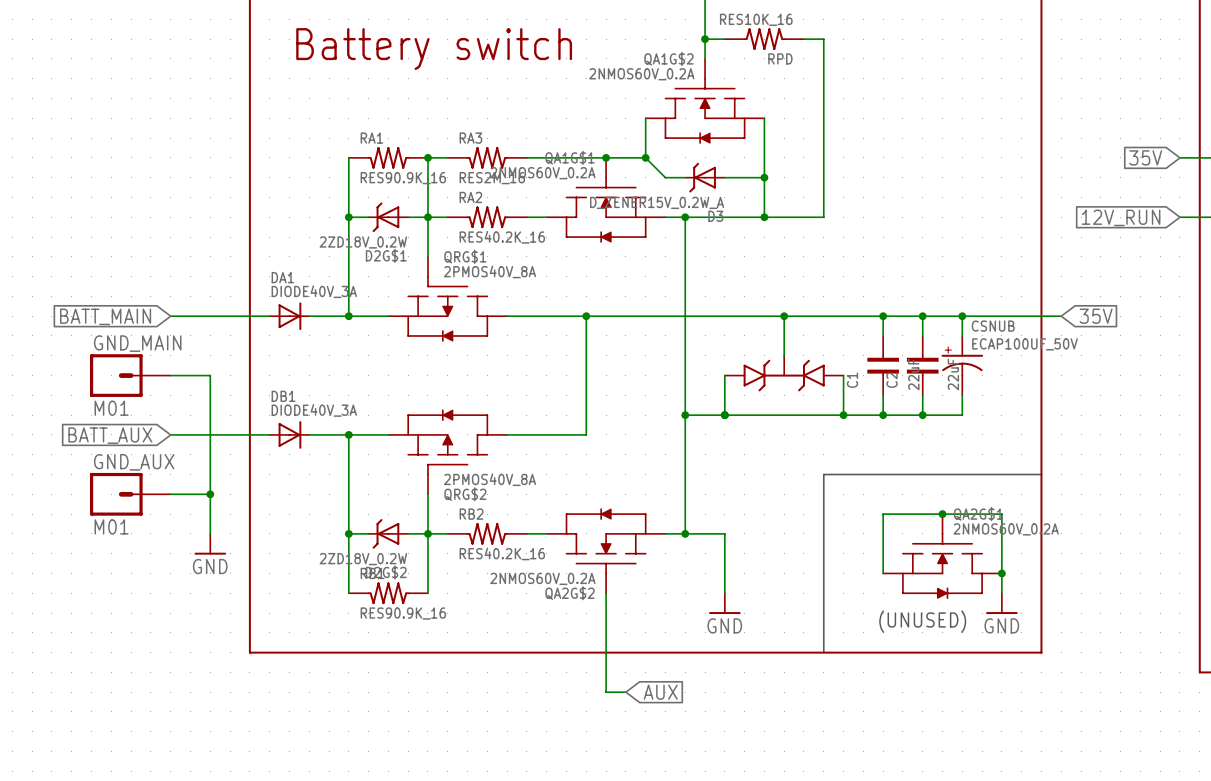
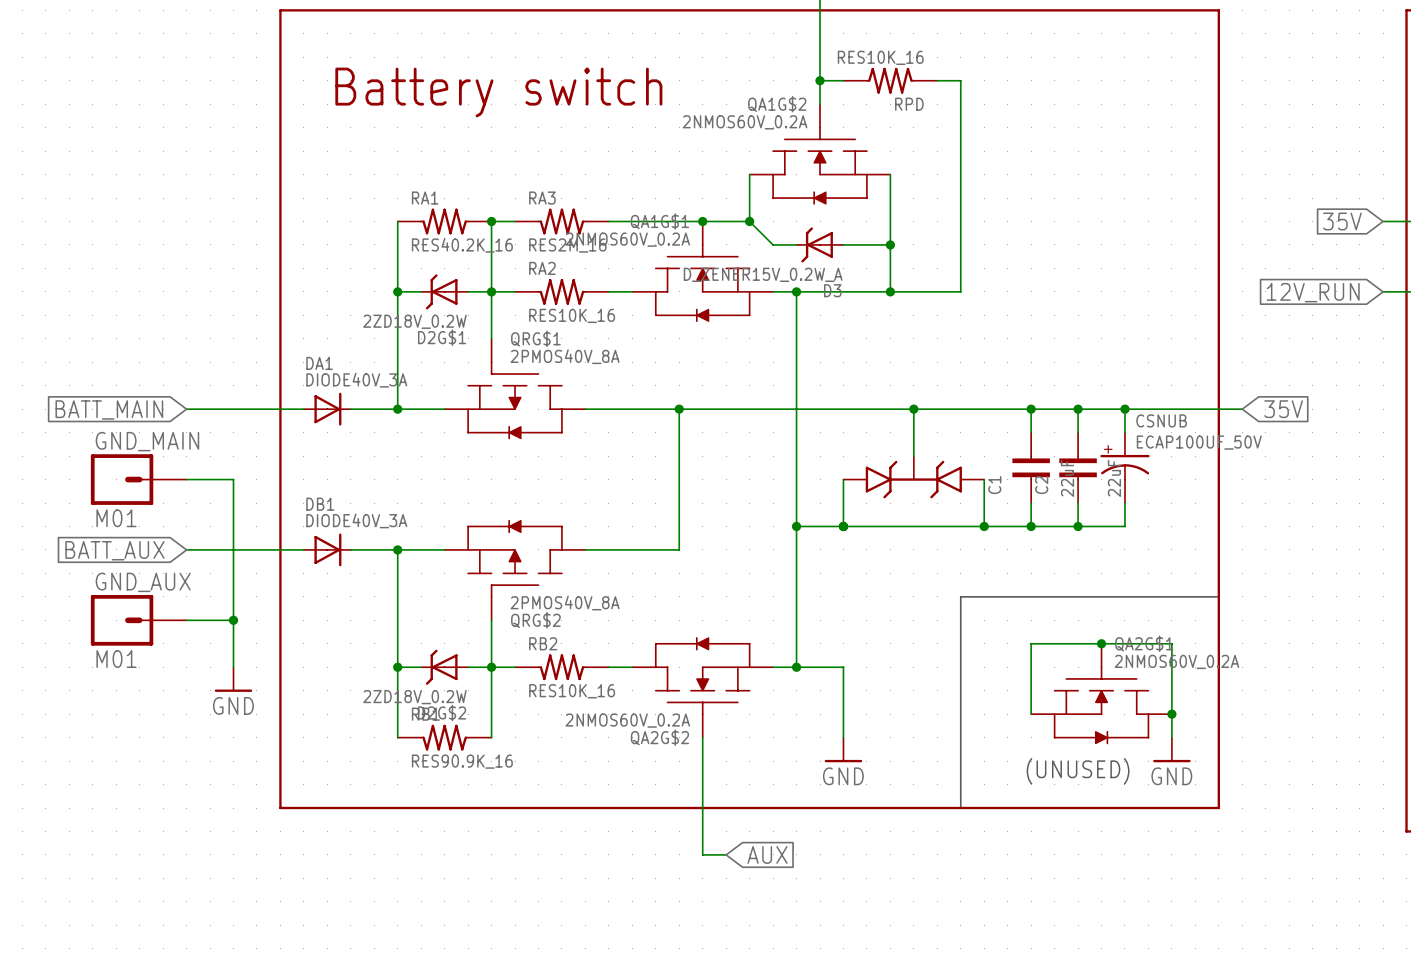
RA1 value: RES90.9K_16 (403, 178) -> RES40.2K_16 (462, 245)
RA2 value: RES40.2K_16 (502, 237) -> RES10K_16 (572, 315)
RB2 value: RES40.2K_16 (502, 553) -> RES10K_16 (572, 691)

